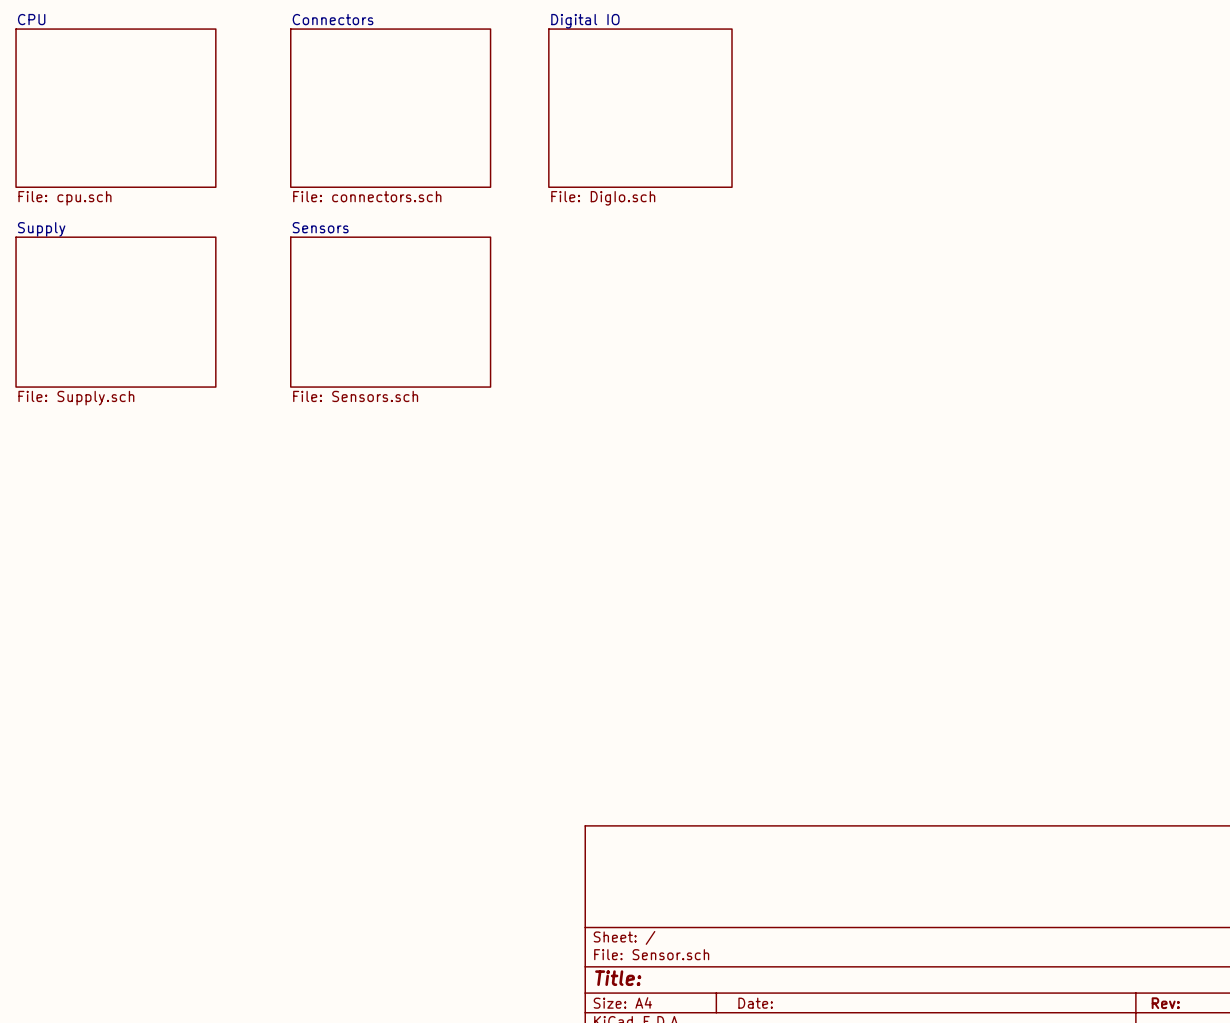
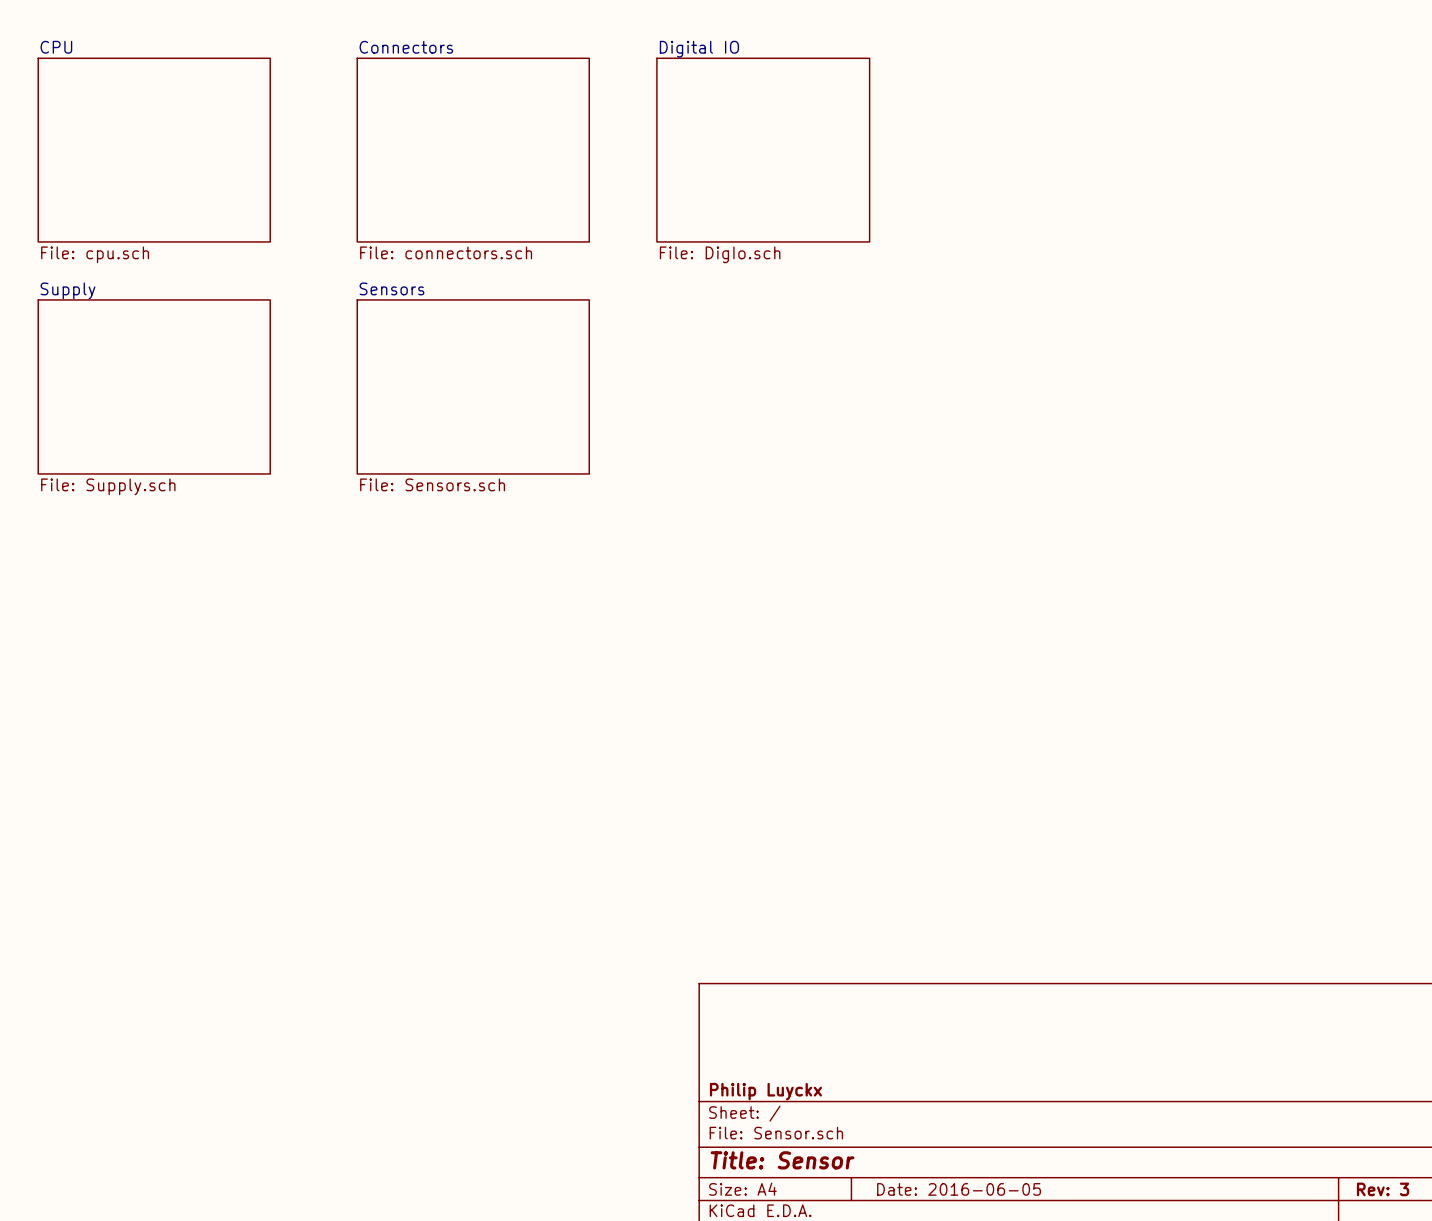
title block: none -> Philip Luyckx (765, 1091)
title block: Title: (618, 978) -> Title: Sensor (782, 1160)
title block: Date: (755, 1003) -> Date: 2016-06-05 (959, 1189)
title block: Rev: (1165, 1003) -> Rev: 3 (1383, 1189)

